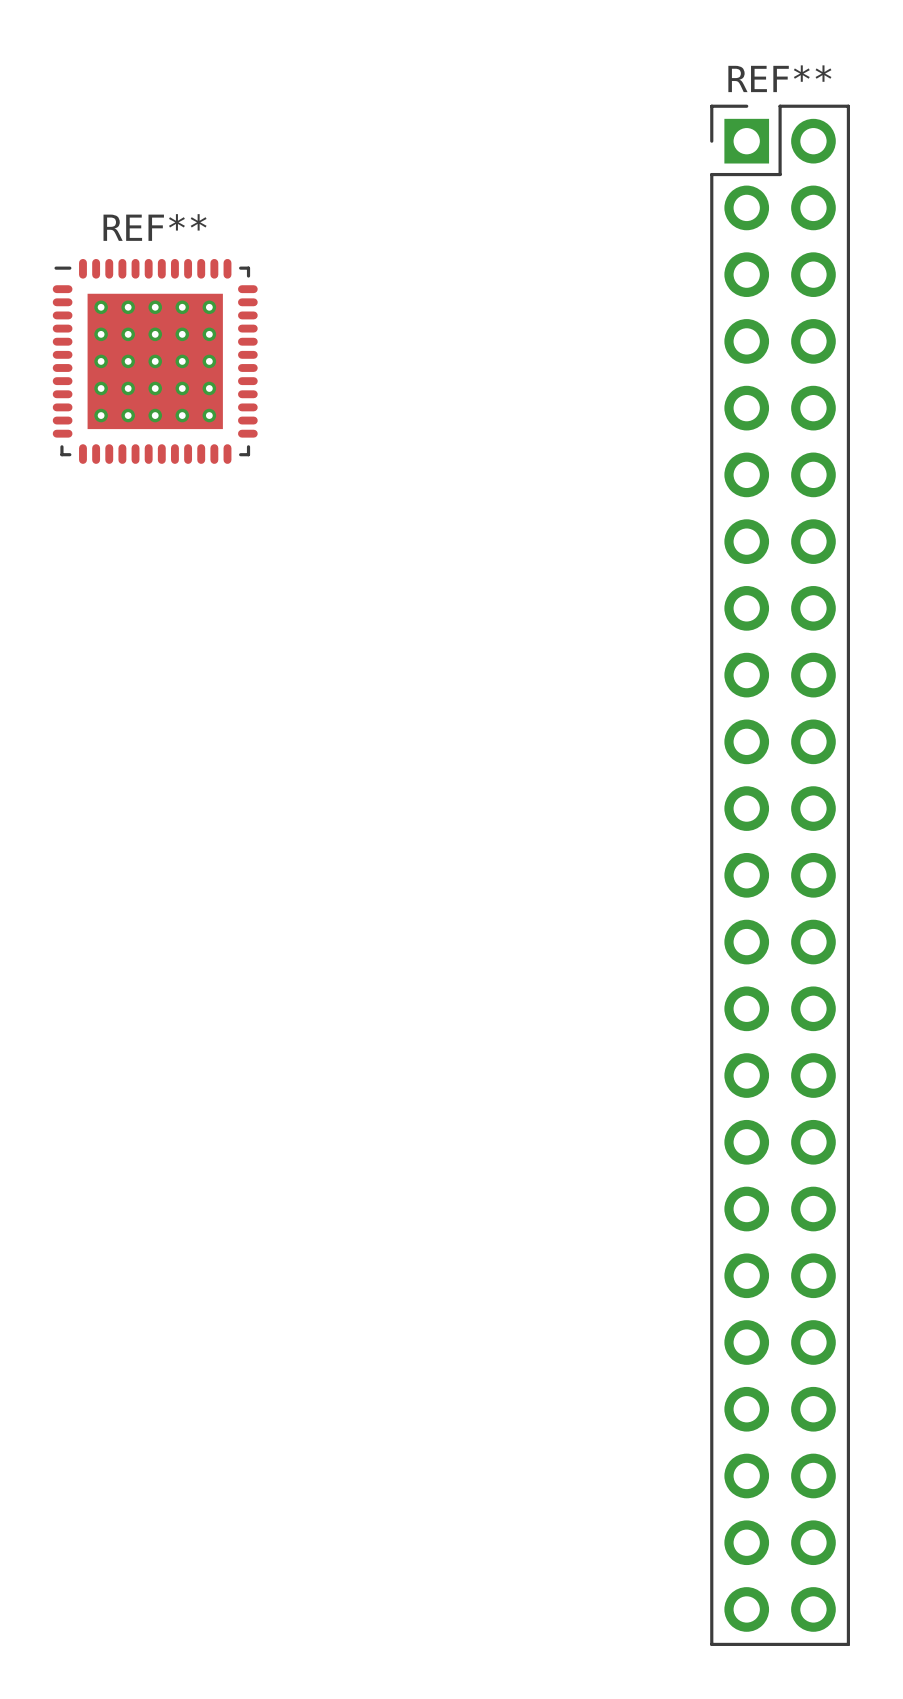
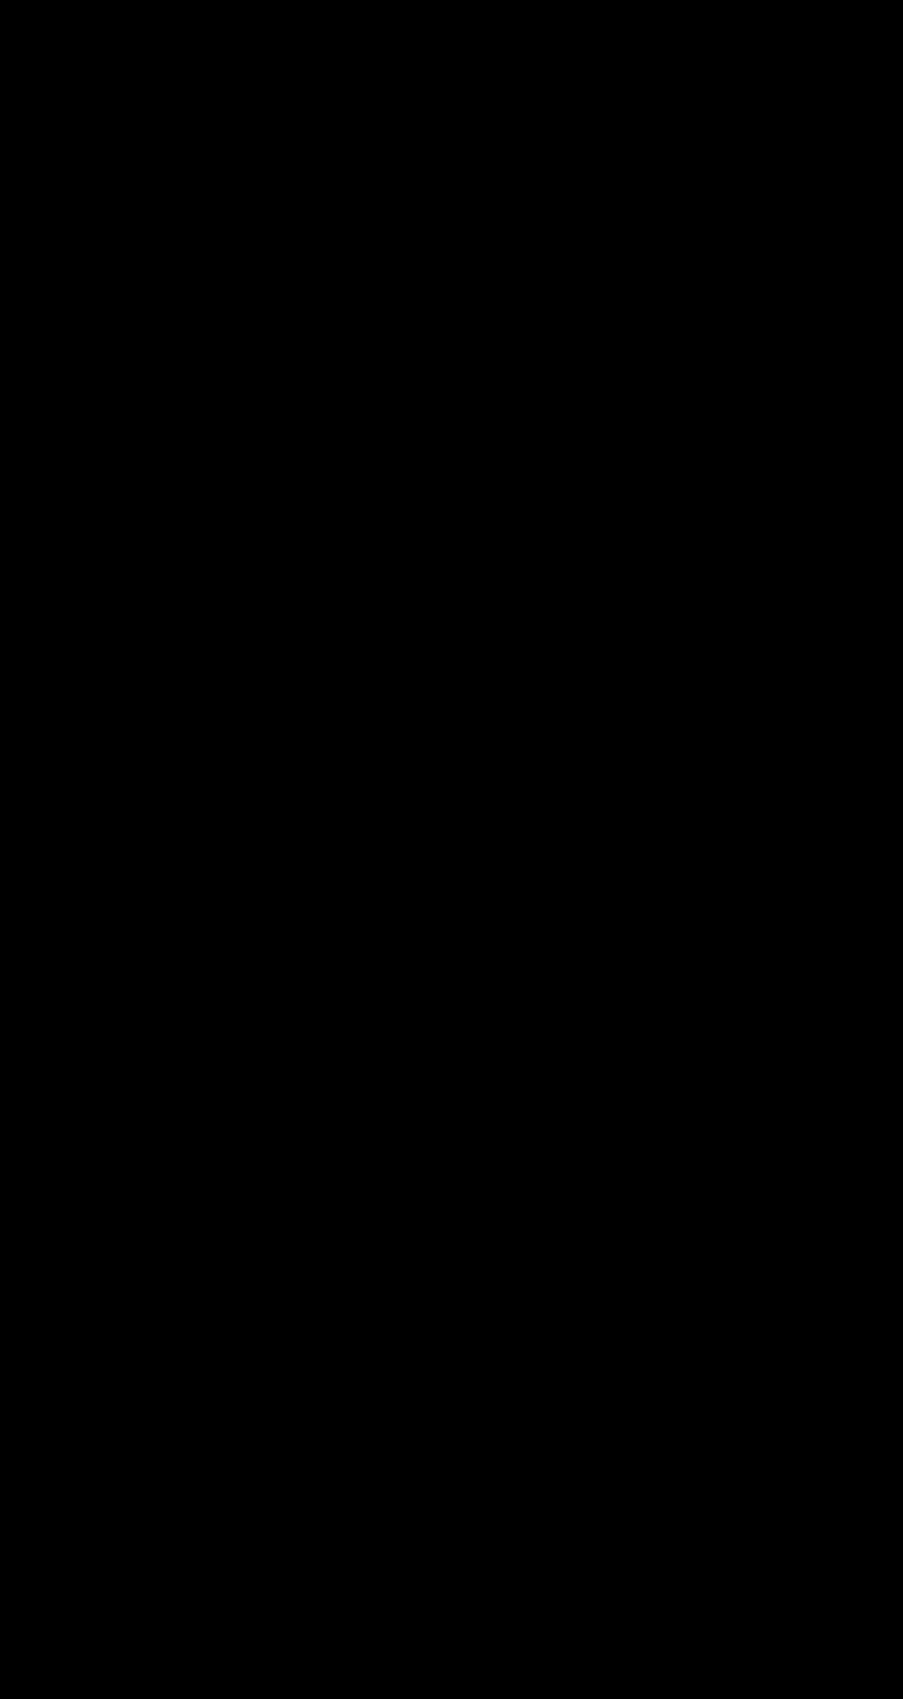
REF**: (155, 361) -> none
REF**: (780, 875) -> none

